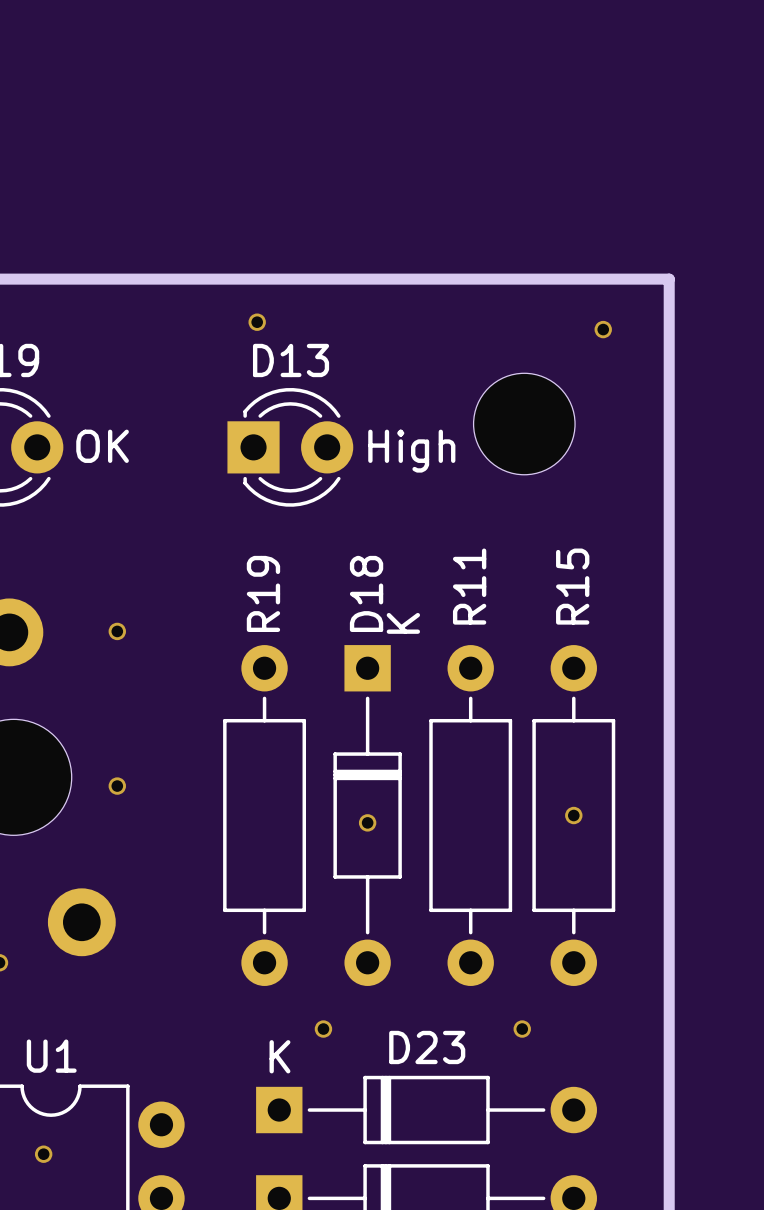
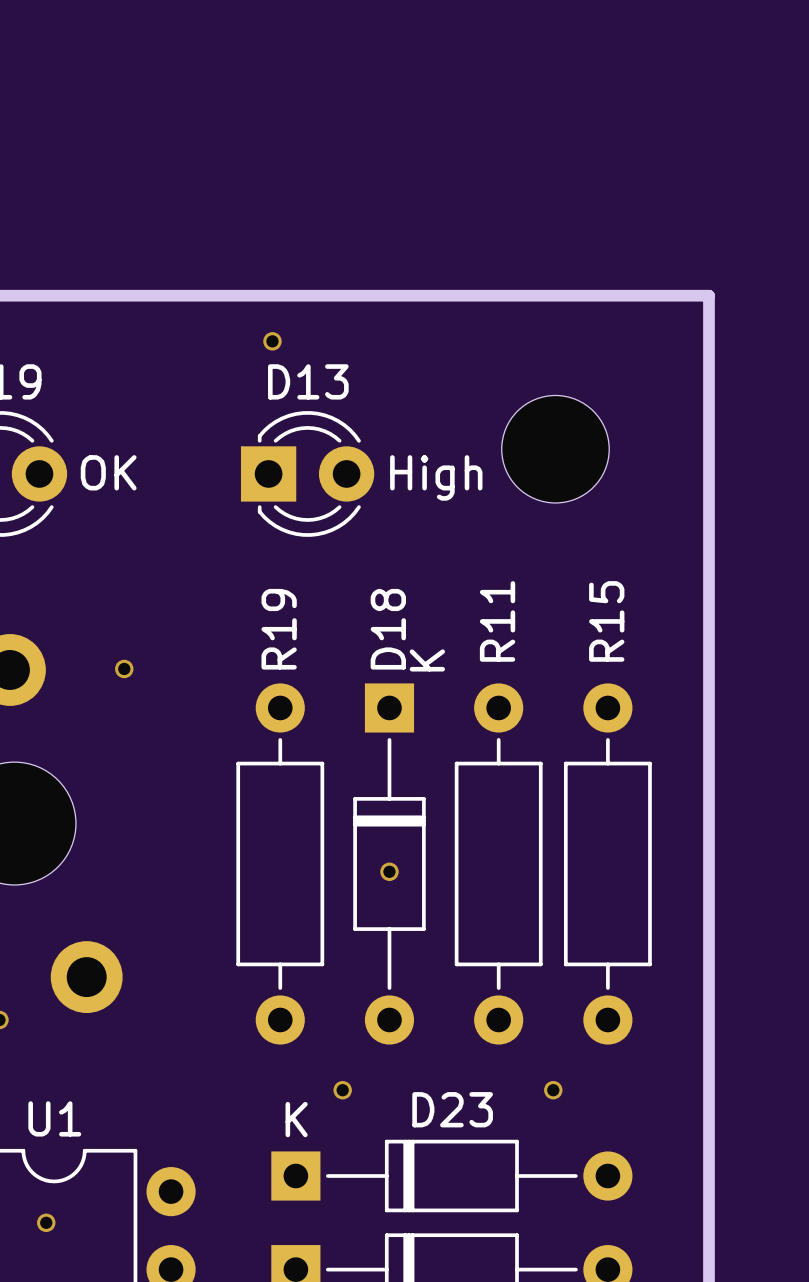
via: (603, 329) -> none
via: (117, 786) -> none
via: (573, 815) -> none

